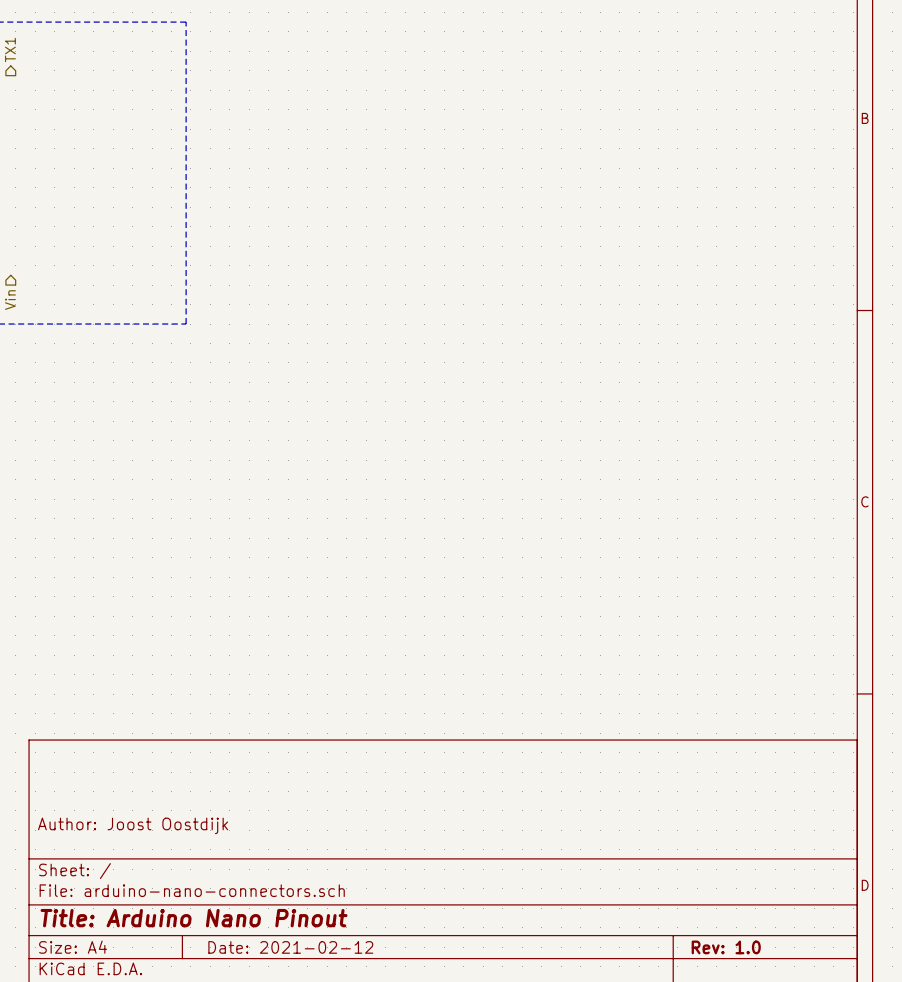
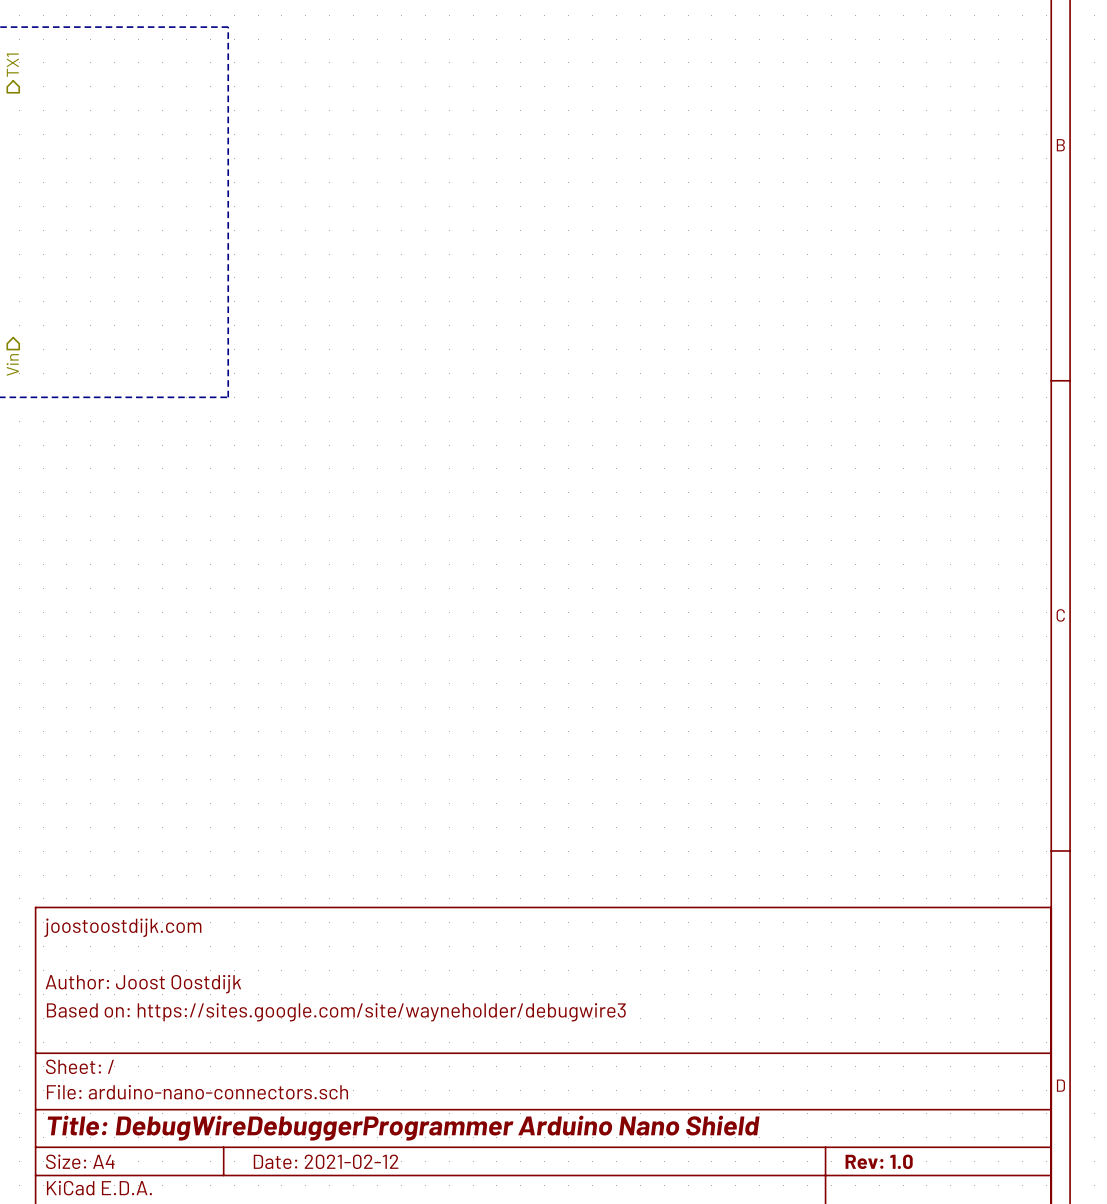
title block: none -> joostoostdijk.com (122, 927)
title block: none -> Author: Joost Oostdijk (143, 984)
title block: Author: Joost Oostdijk (133, 825) -> Based on: https://sites.google.com/site/wayneholder/debugwire3 (336, 1012)
title block: Title: Arduino Nano Pinout (194, 918) -> Title: DebugWireDebuggerProgrammer Arduino Nano Shield (403, 1128)

